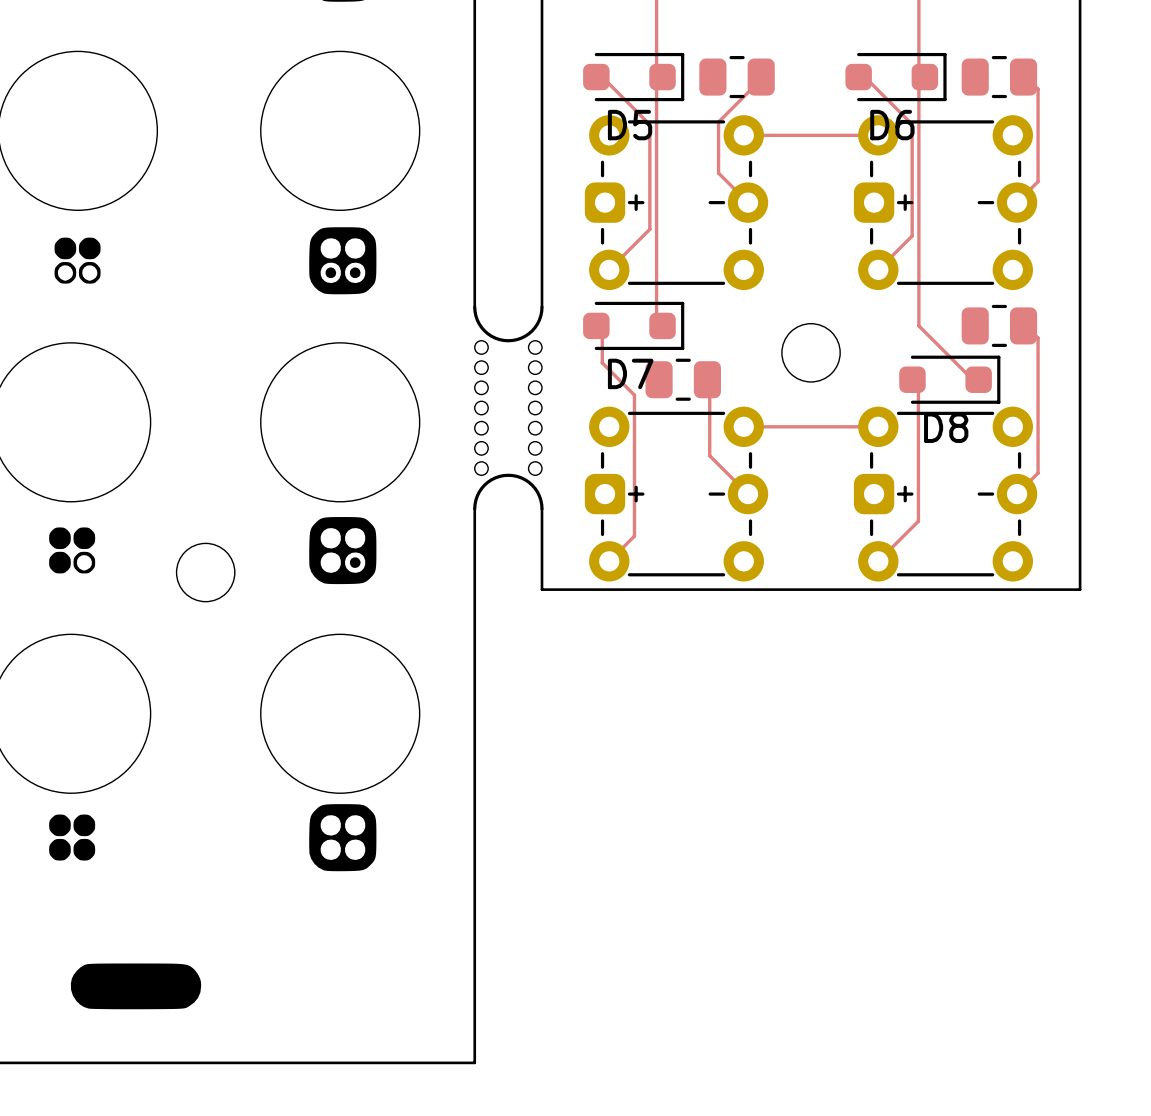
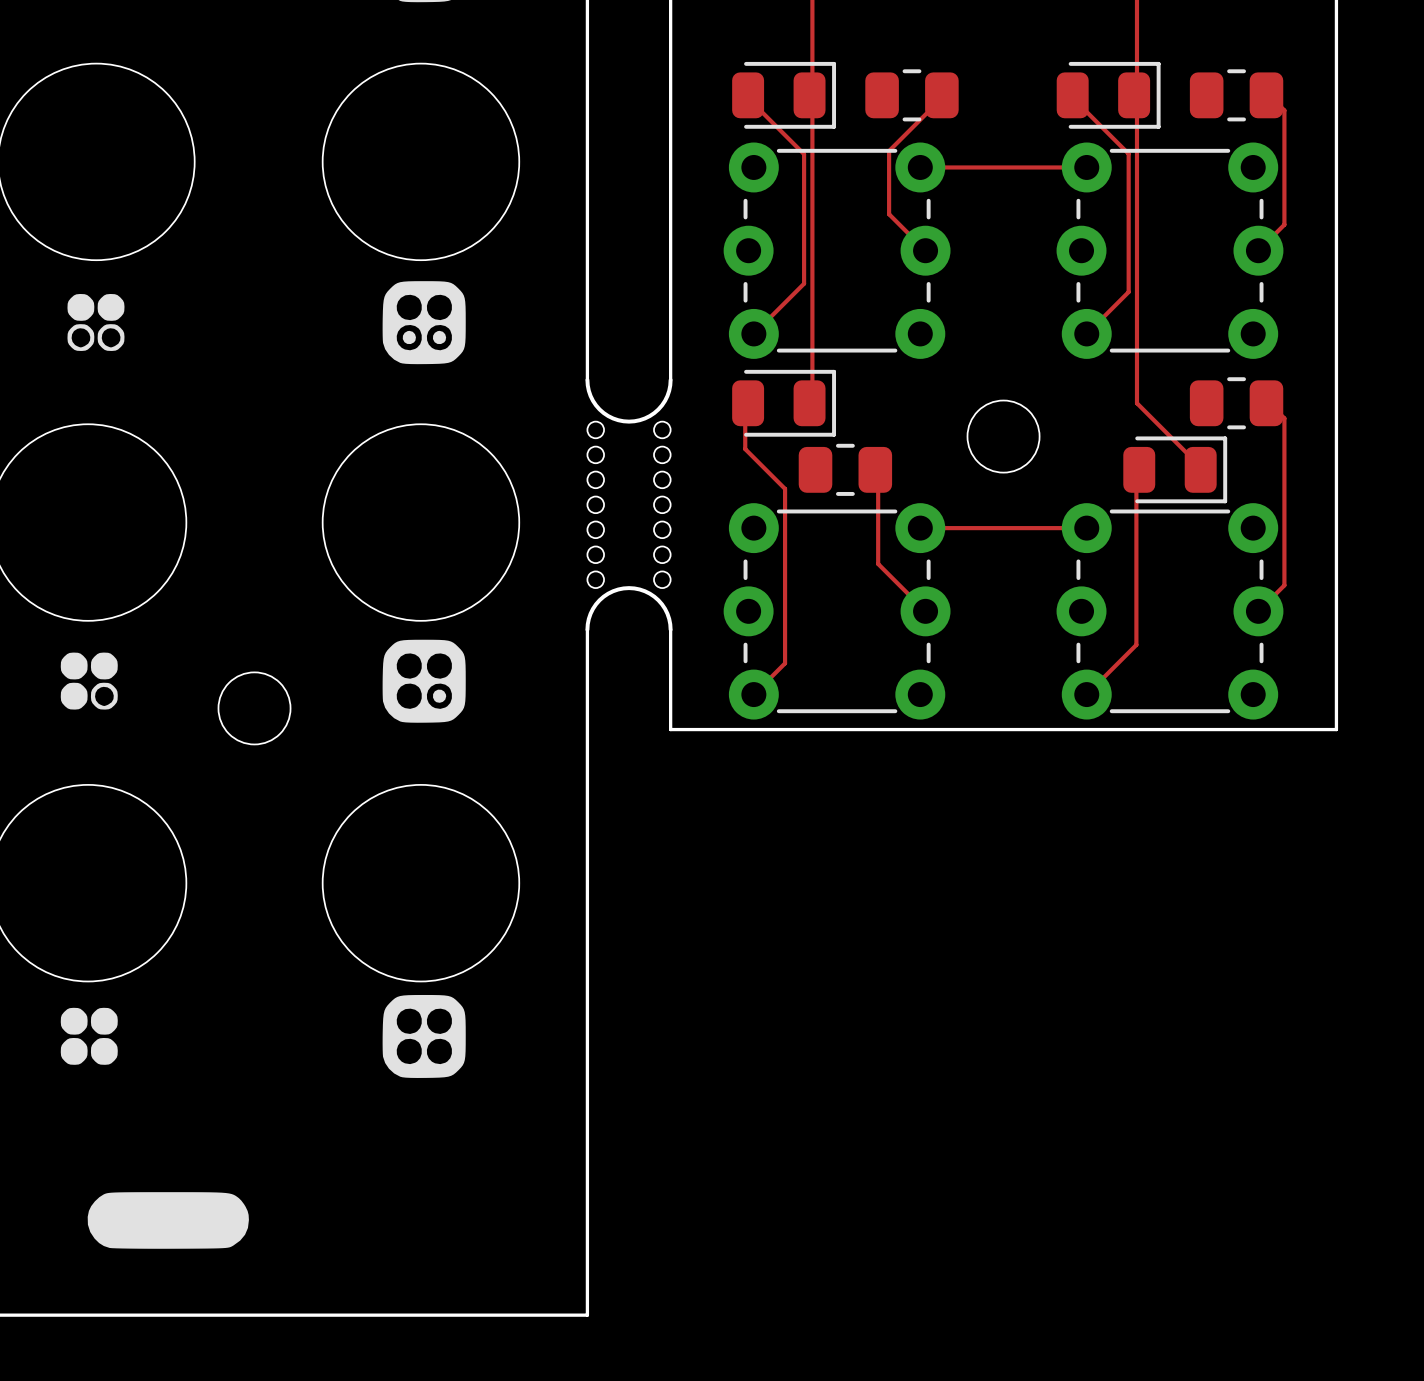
D5: (633, 77) -> none
part: none -> (784, 95)
D6: (895, 77) -> none
part: none -> (1108, 95)
part footprint: [584, 115, 769, 291] -> [723, 142, 951, 359]
part footprint: [853, 115, 1038, 291] -> [1056, 142, 1284, 359]
D7: (633, 325) -> none
part: none -> (784, 403)
D8: (949, 379) -> none
part: none -> (1175, 469)
part footprint: [584, 406, 769, 582] -> [723, 503, 951, 720]
part footprint: [853, 406, 1038, 582] -> [1056, 503, 1284, 720]

